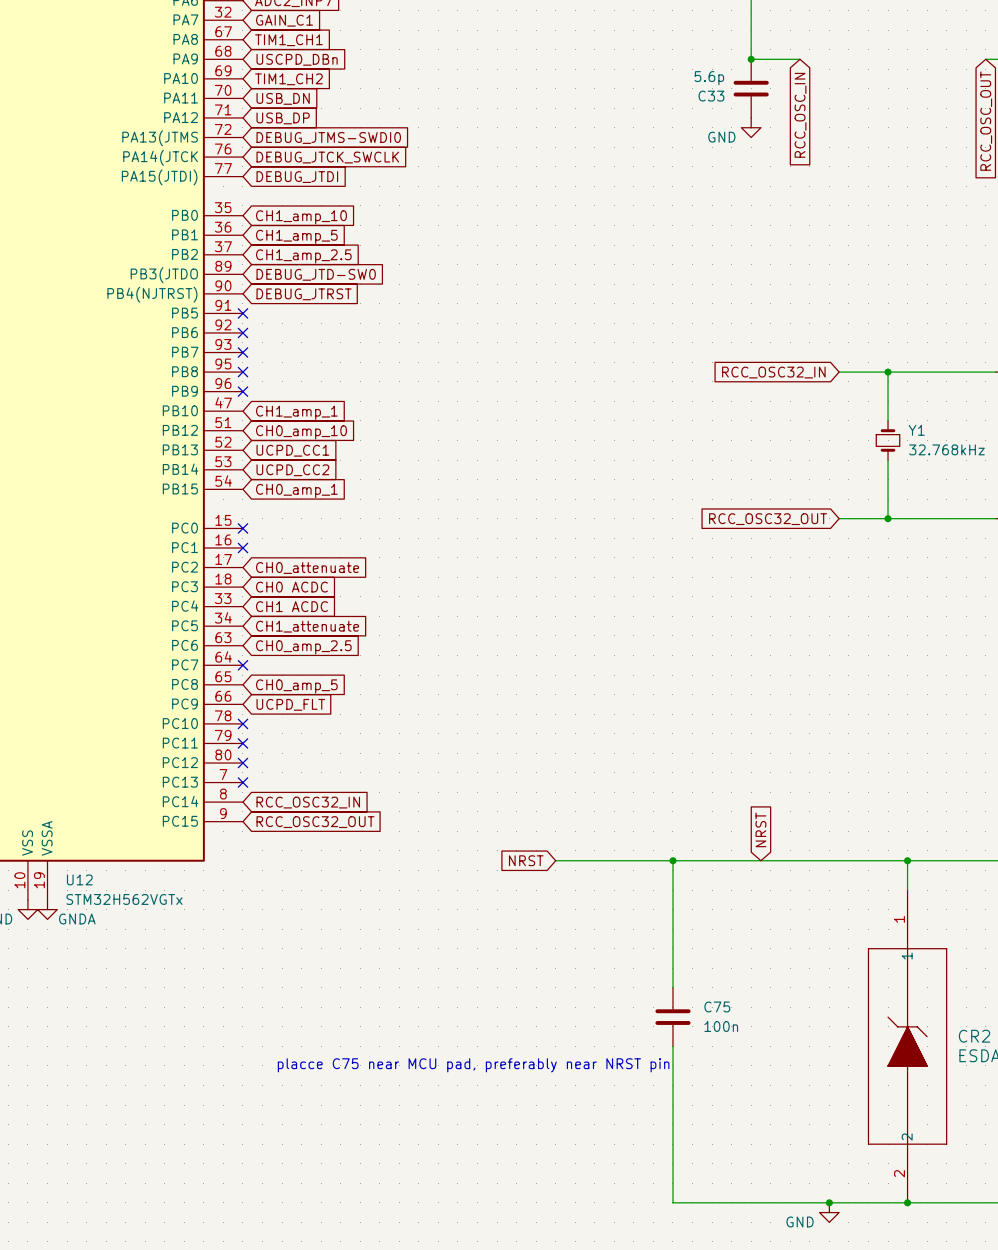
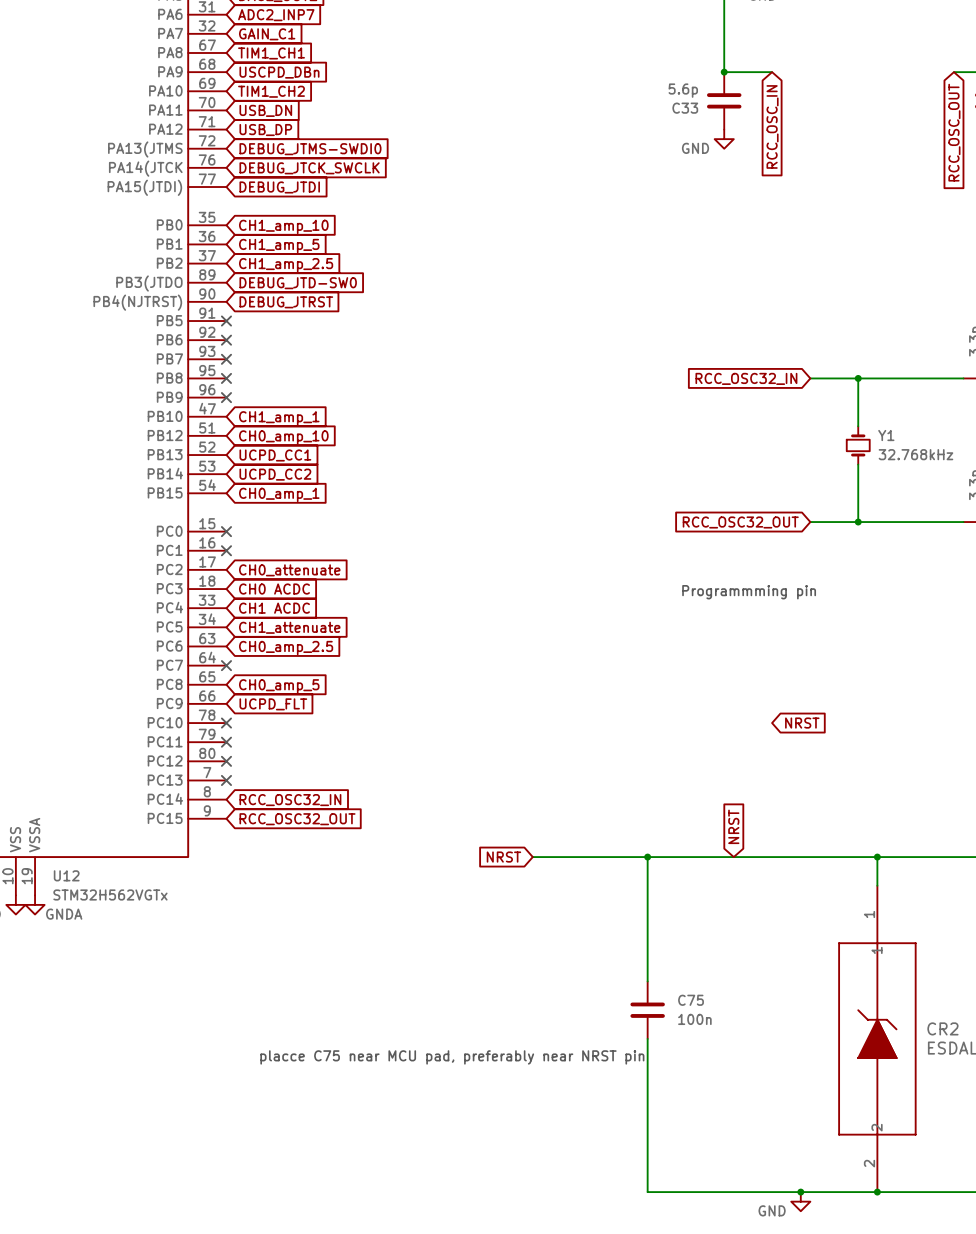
text: none -> Programmming pin (749, 592)
global label: none -> NRST (802, 723)

